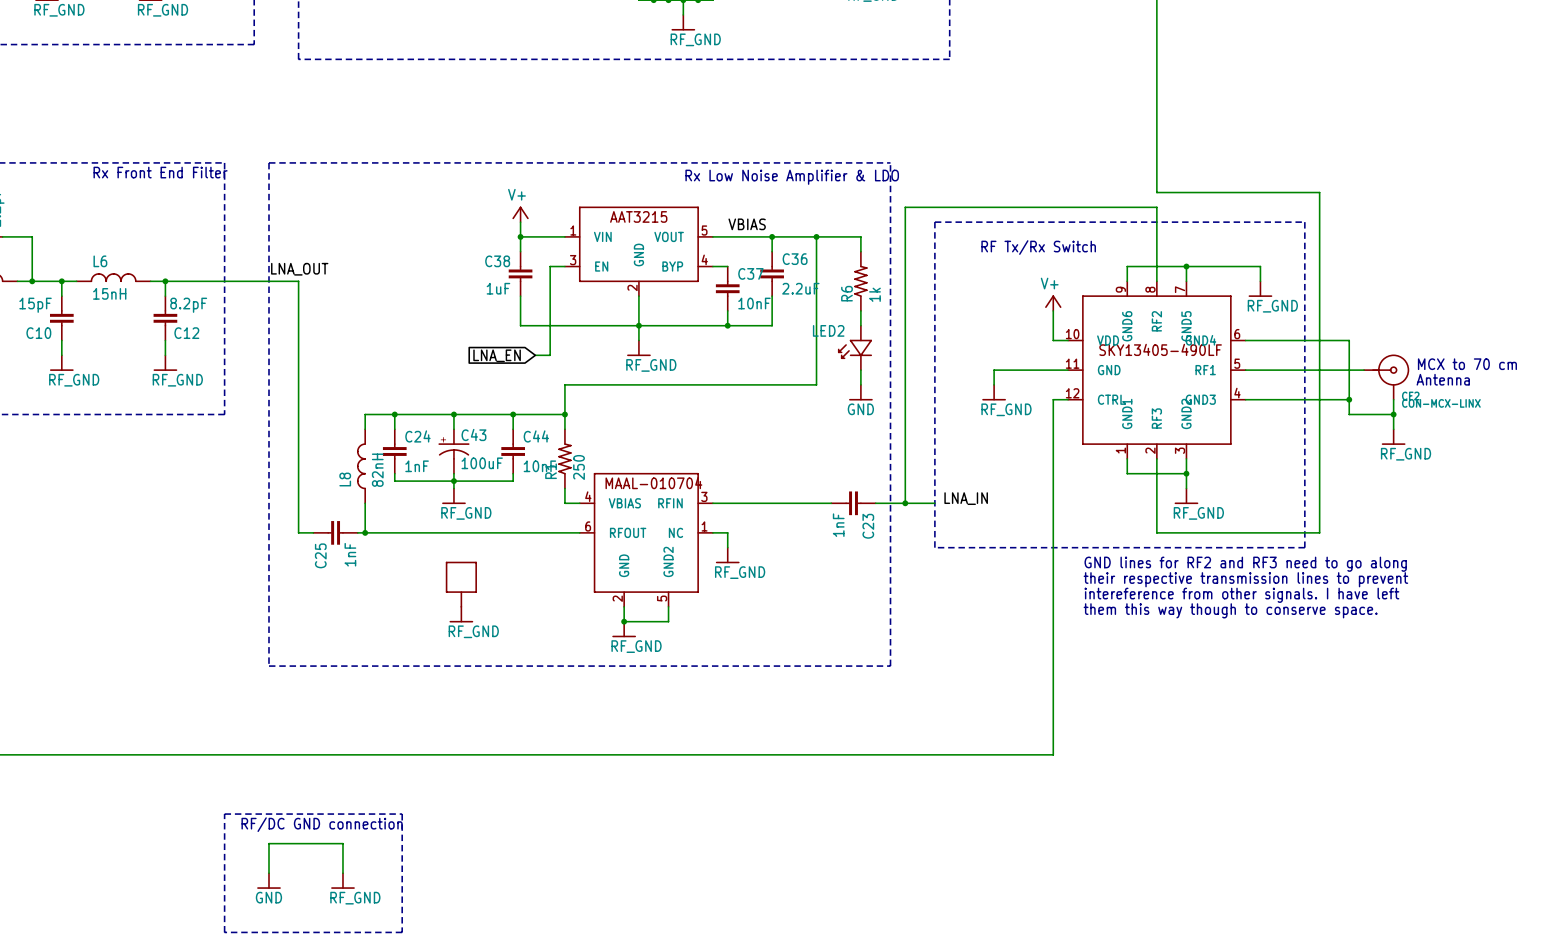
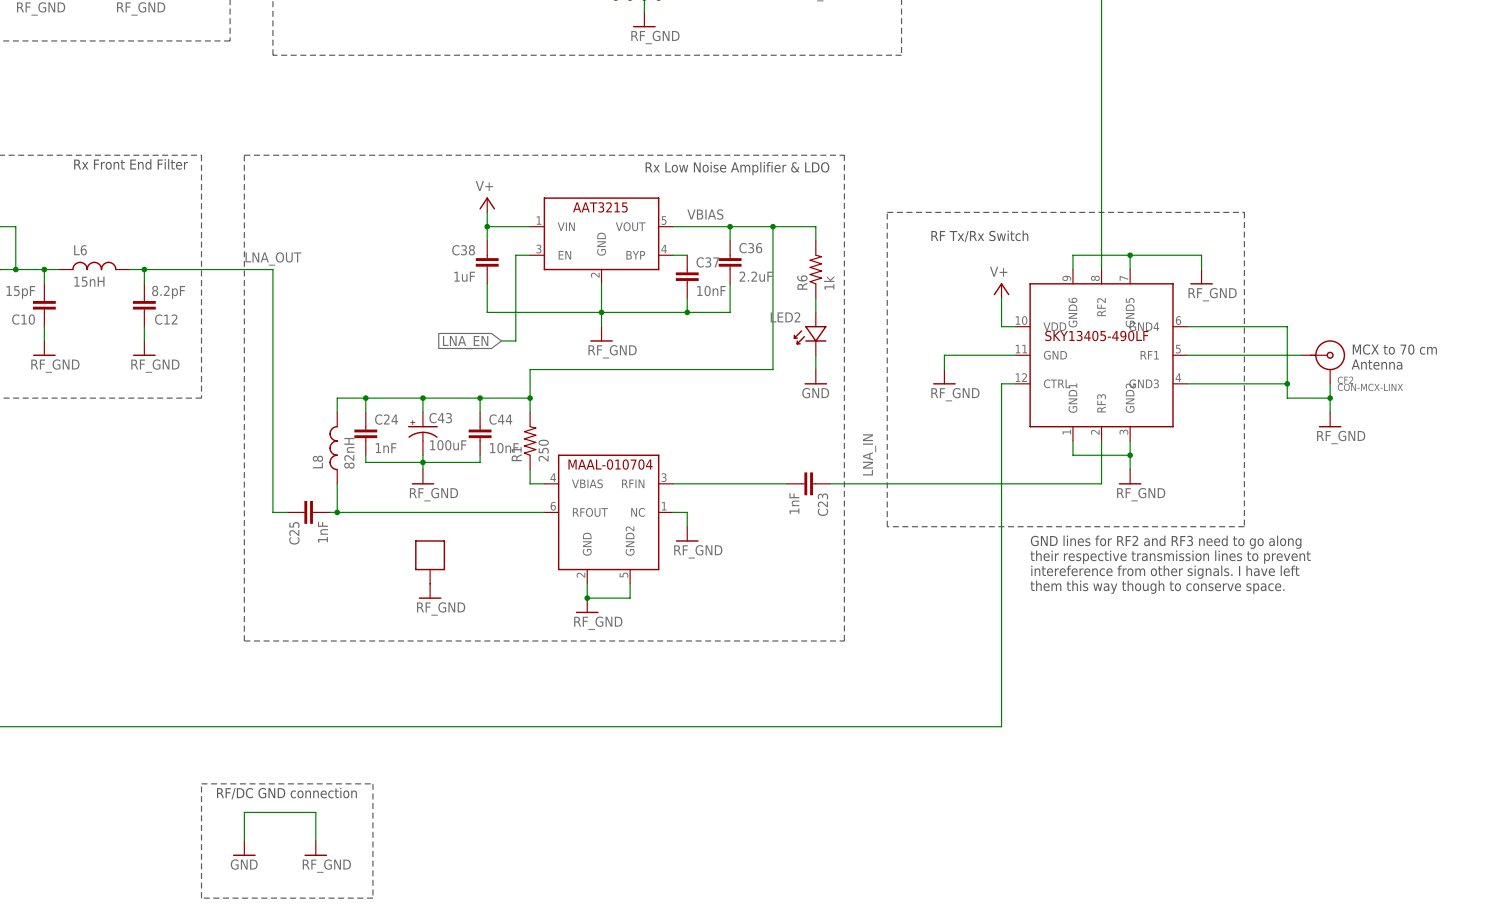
wire: (1156, 192) (1319, 192) (1319, 532) (1156, 532) (1156, 503) -> (1101, 183) (1101, 198)
wire: (1156, 207) (905, 207) (905, 503) -> none
label rotation: 0° (966, 498) -> 90° counterclockwise (869, 454)
label position: LNA_IN (966, 498) -> LNA_IN (869, 454)
junction: (905, 503) -> none
wire: none -> (887, 483) (1101, 483)

